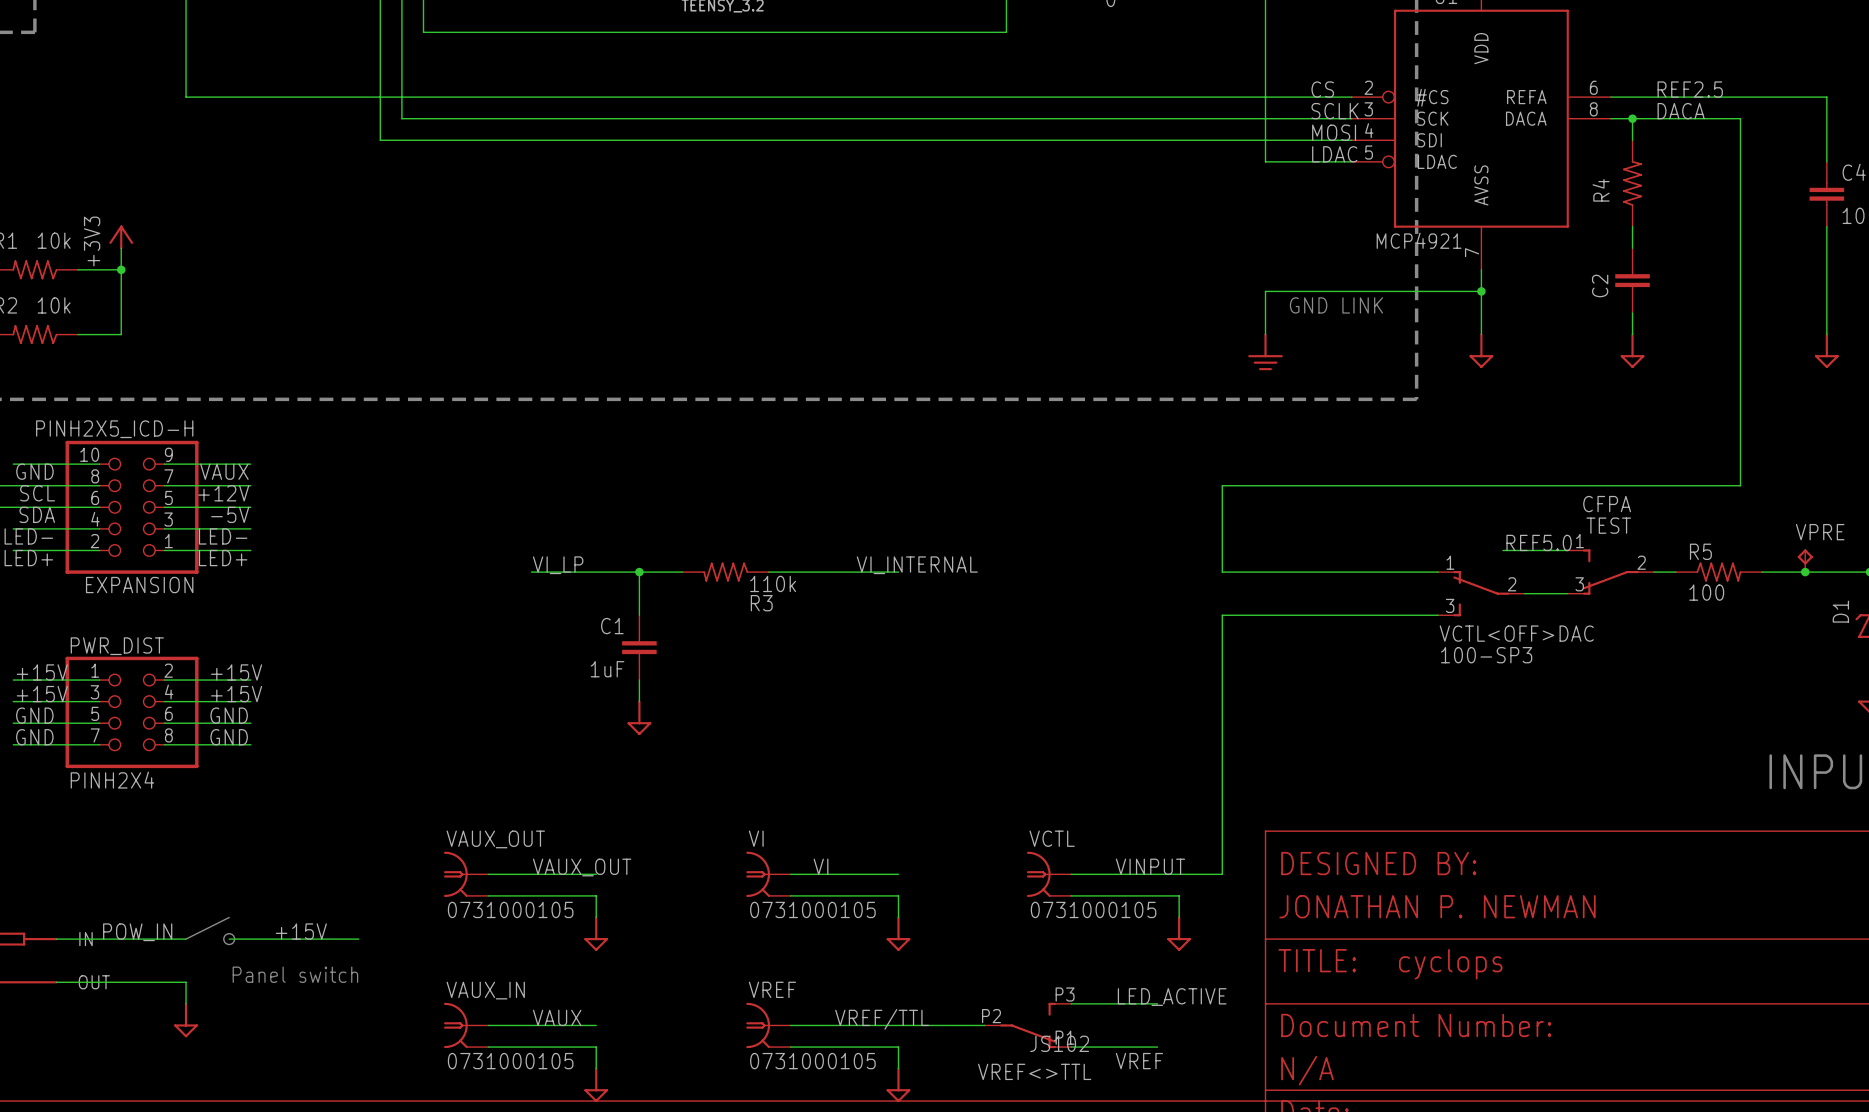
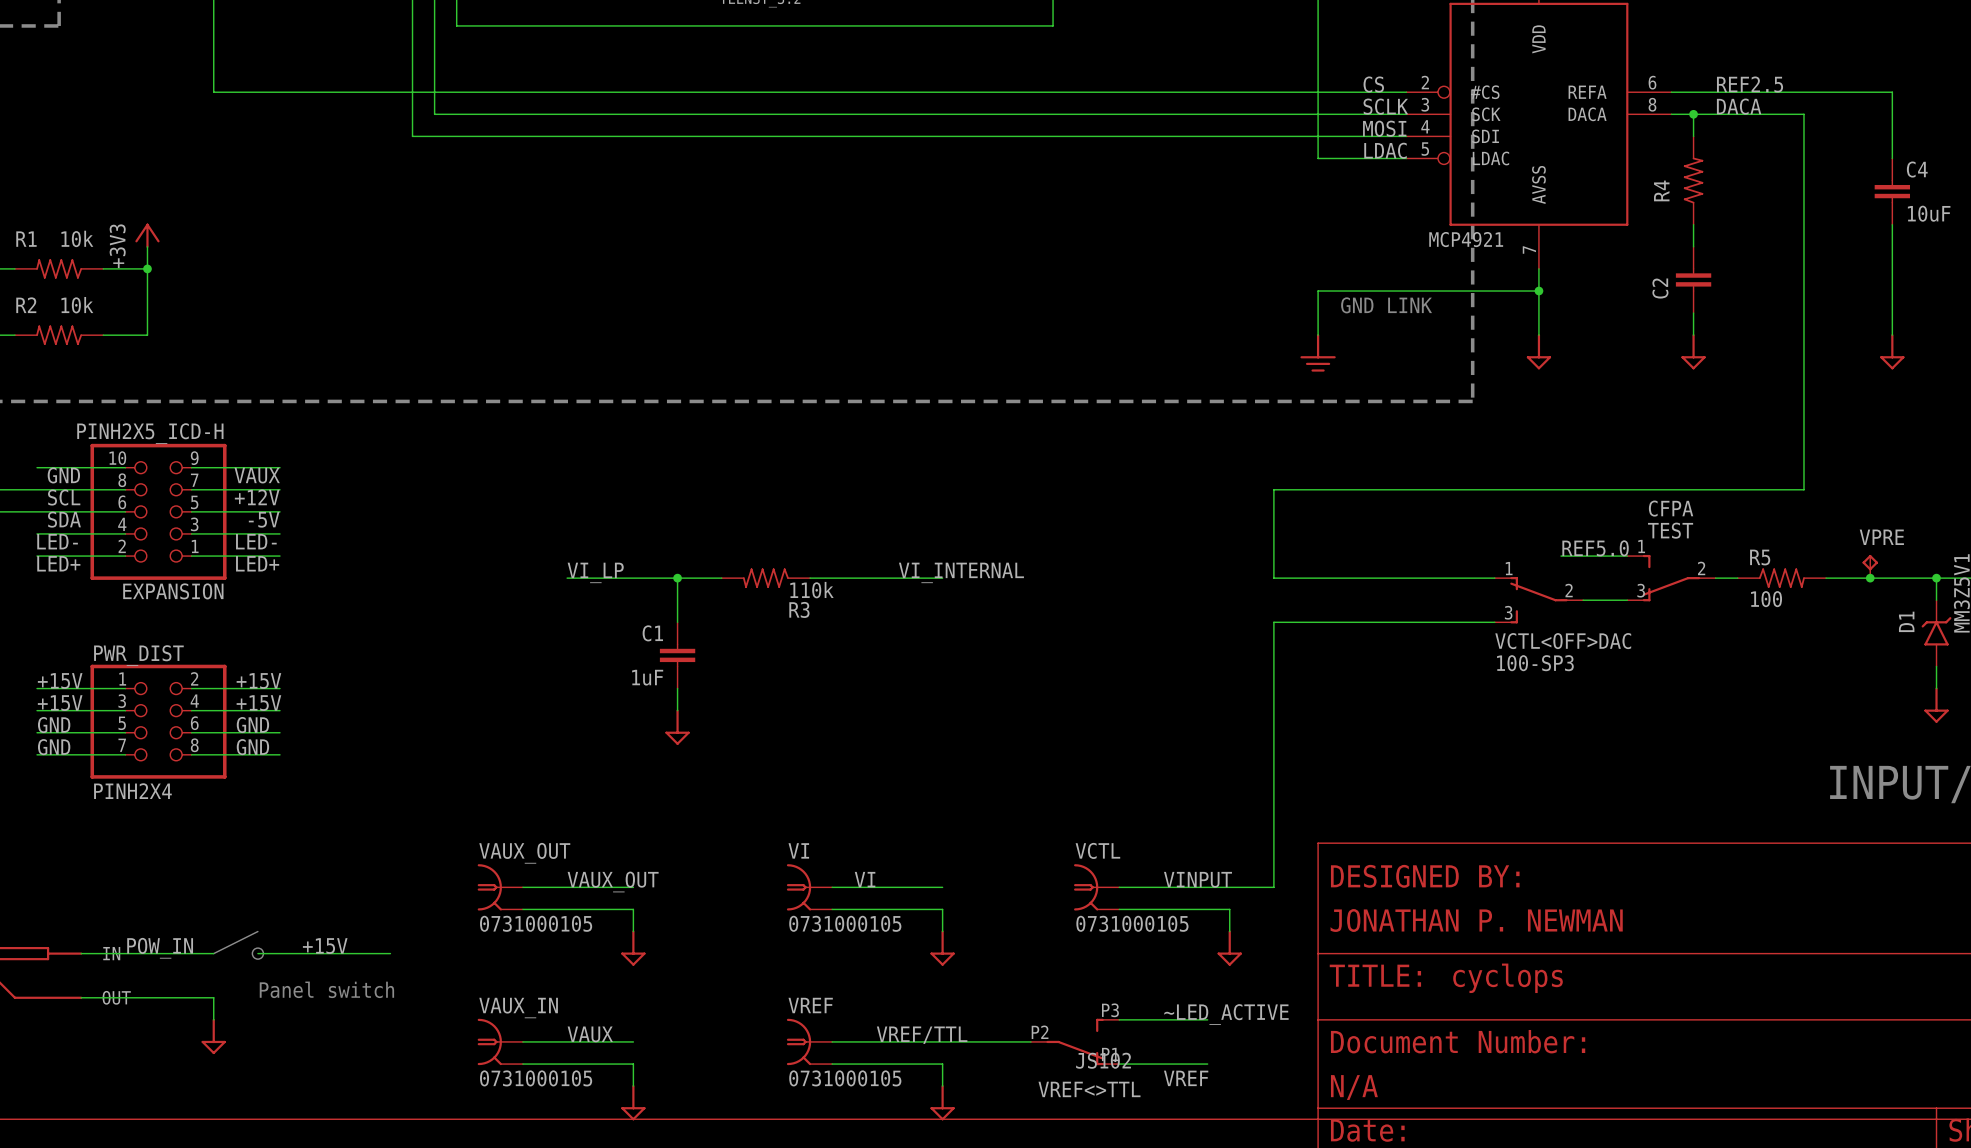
label: LED_ACTIVE (1172, 997) -> ~LED_ACTIVE (1226, 1014)

